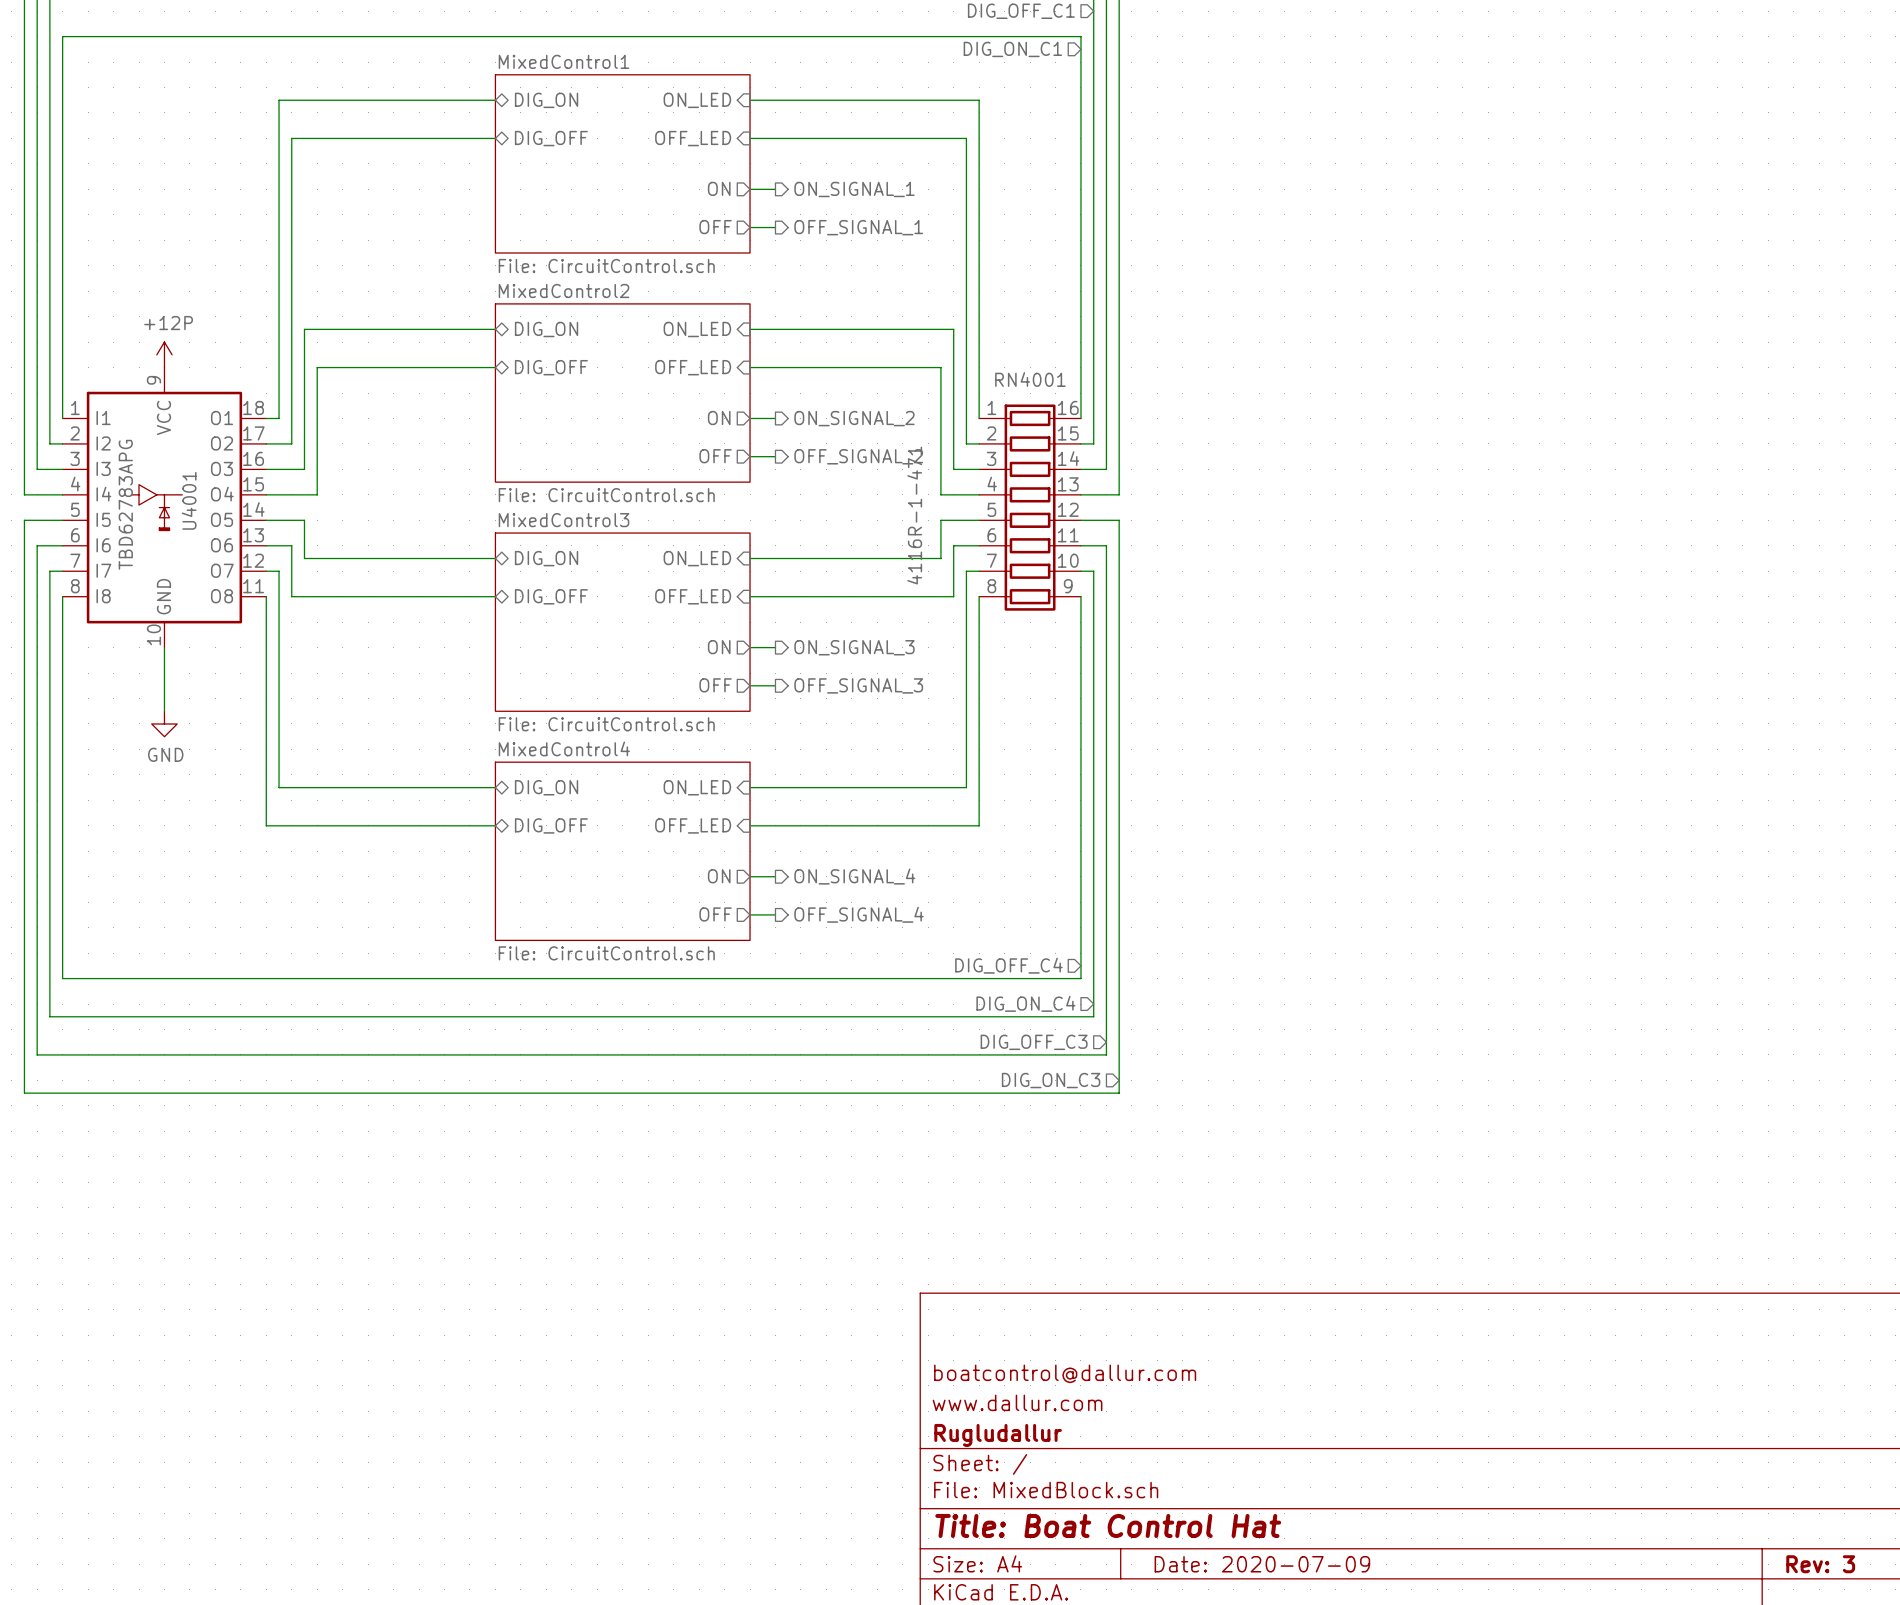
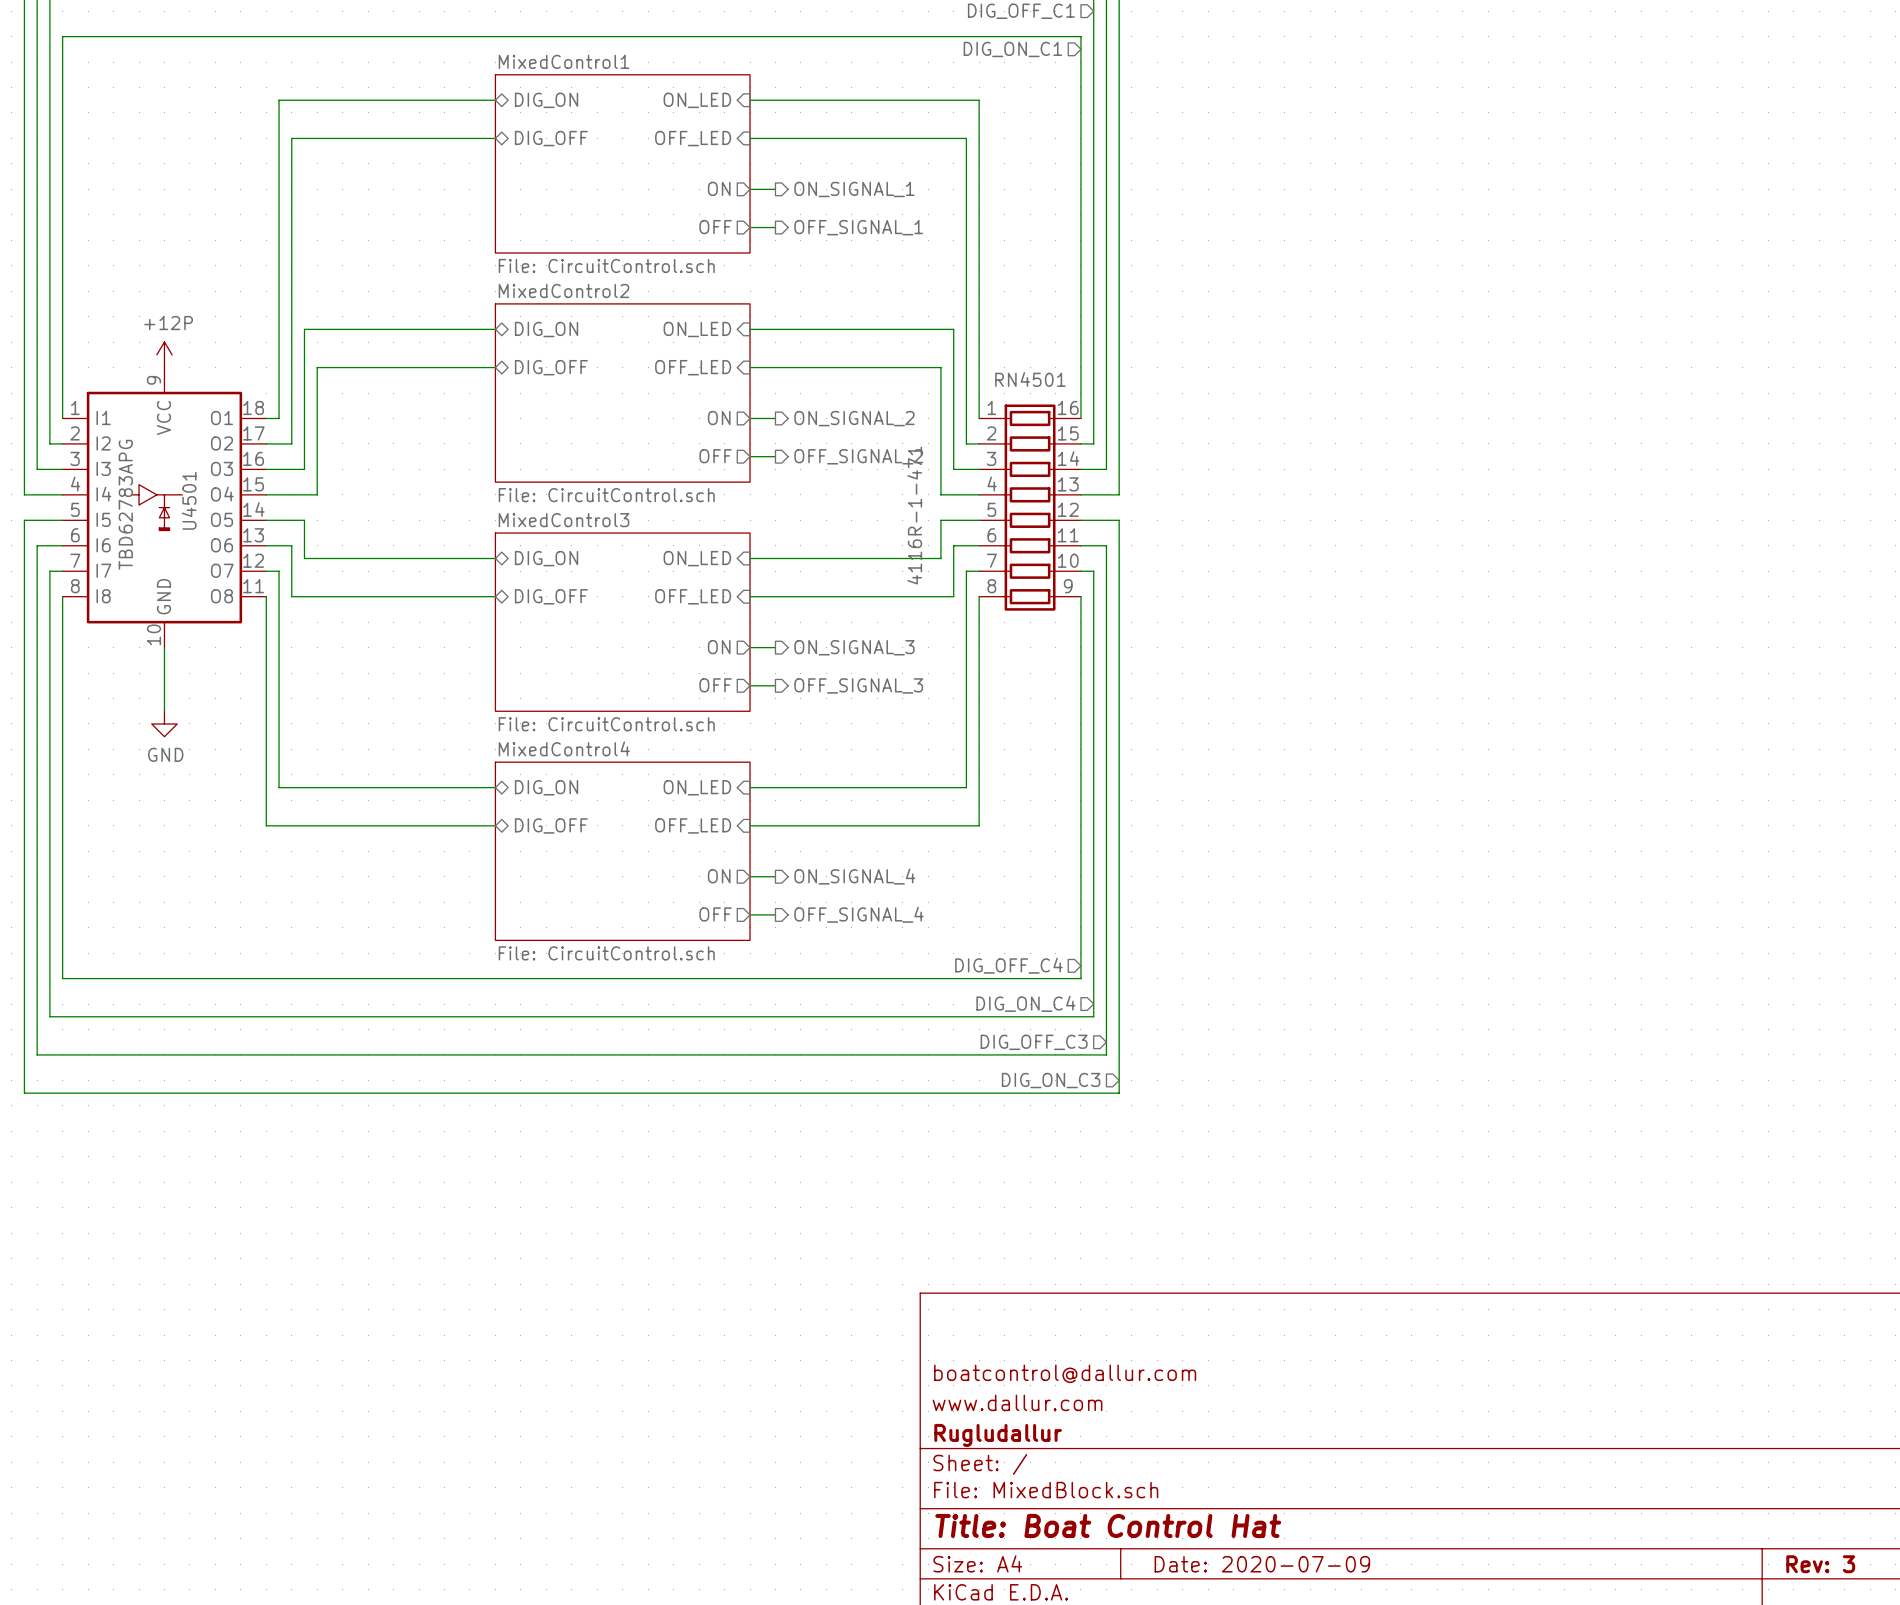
RN4001 name: RN4001 (1030, 379) -> RN4501 (1030, 379)
U4001 name: U4001 (189, 500) -> U4501 (189, 500)

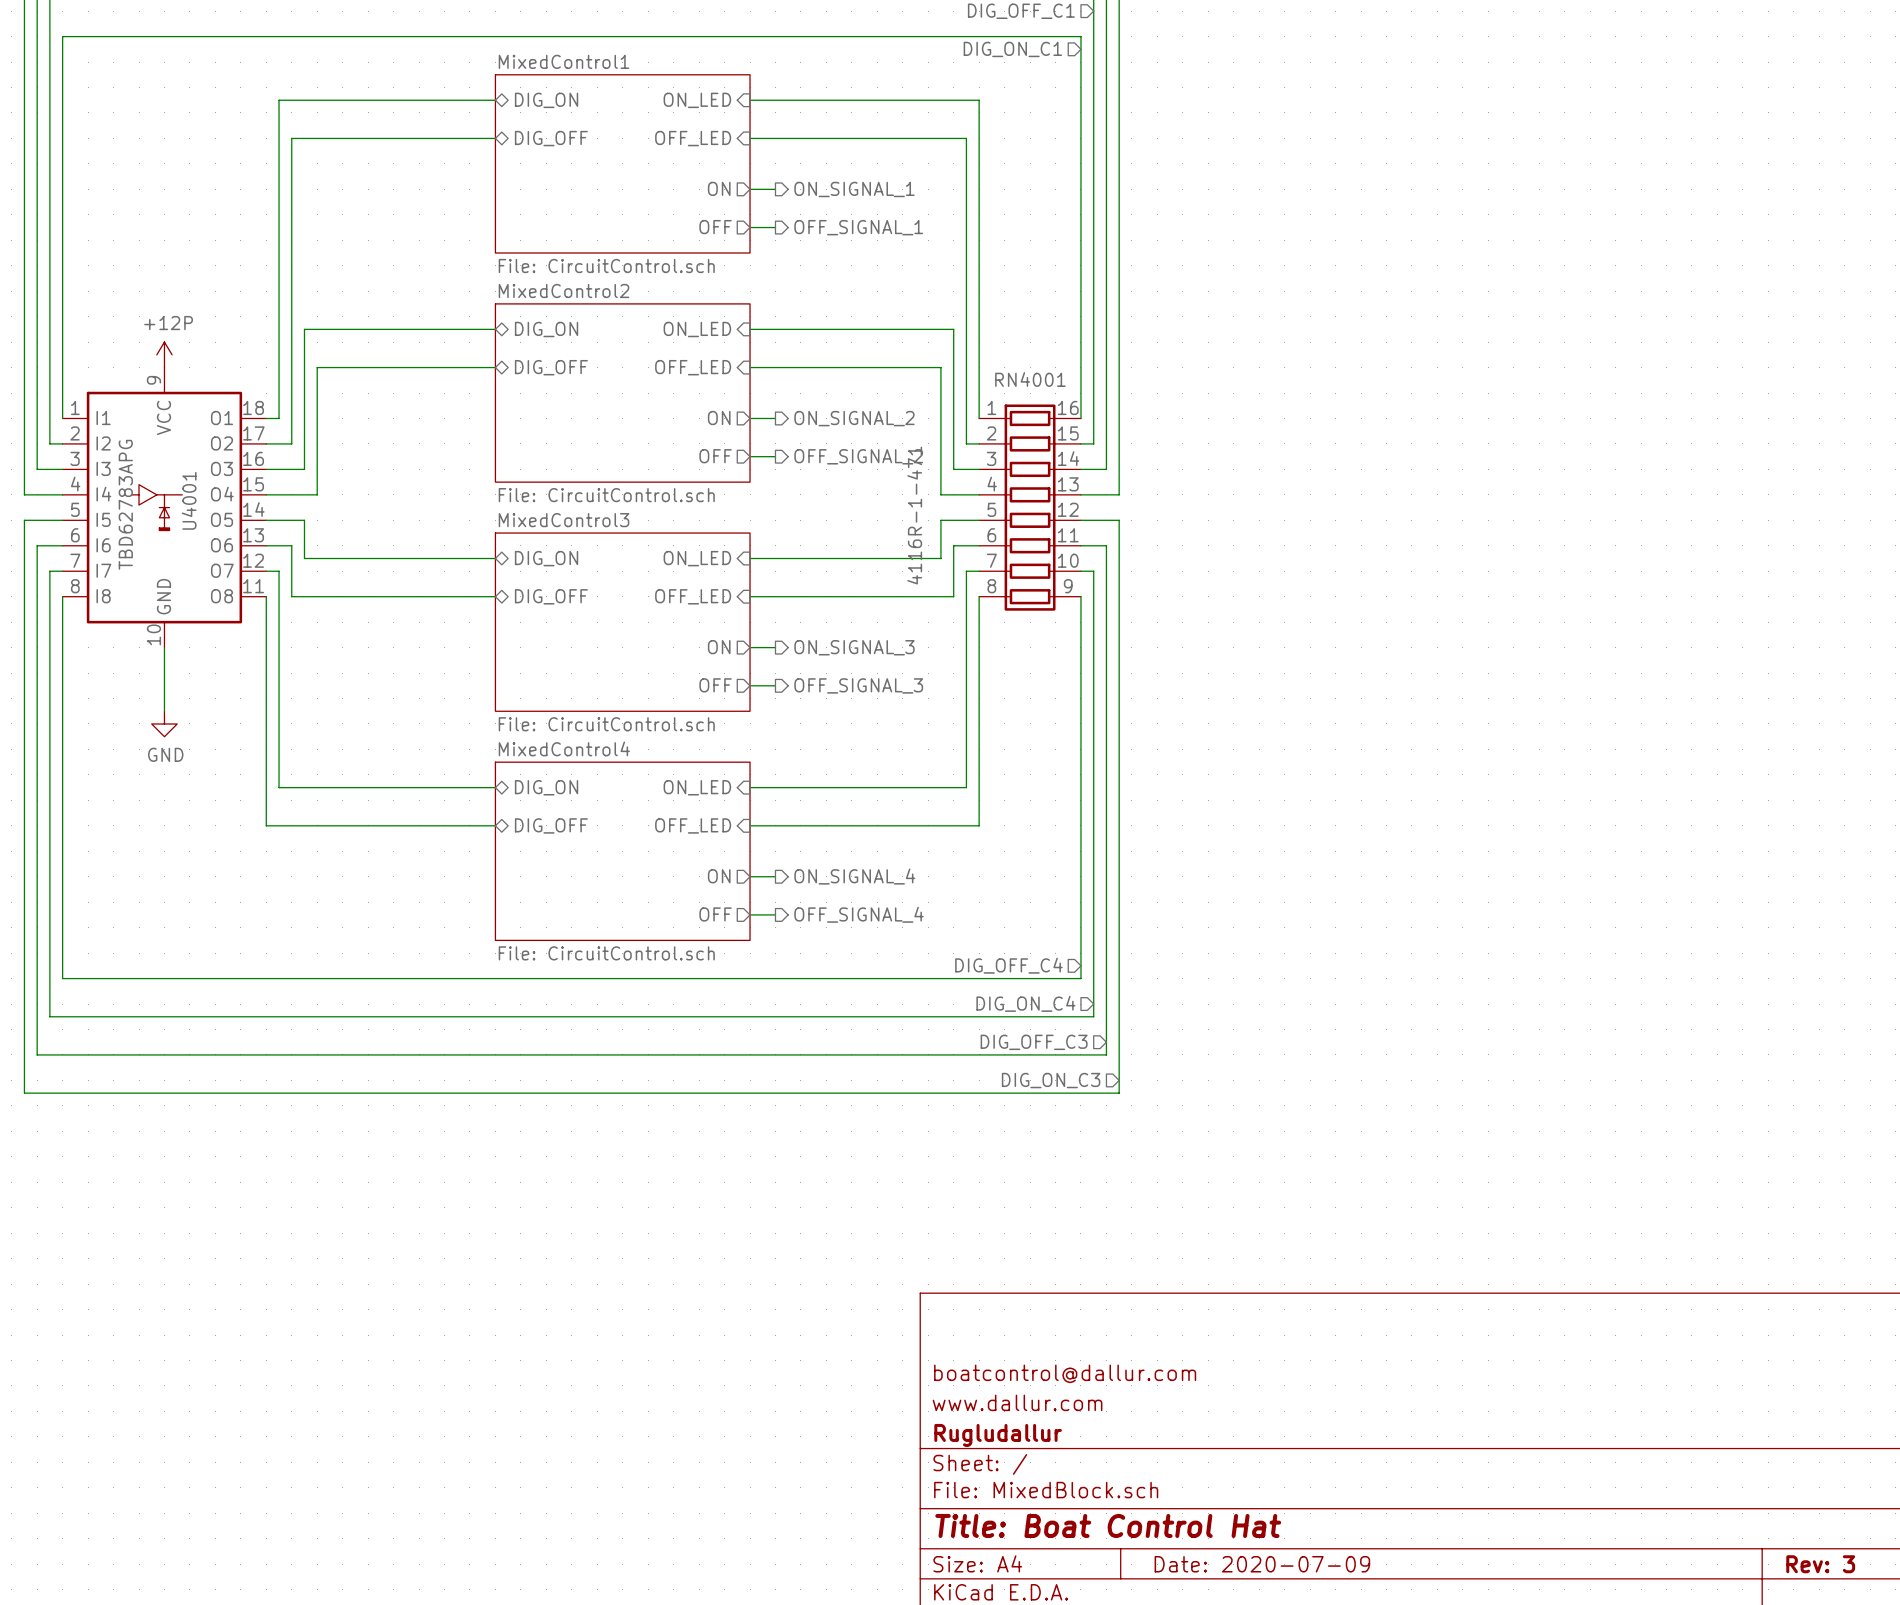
RN4501 name: RN4501 (1030, 379) -> RN4001 (1030, 379)
U4501 name: U4501 (189, 500) -> U4001 (189, 500)

